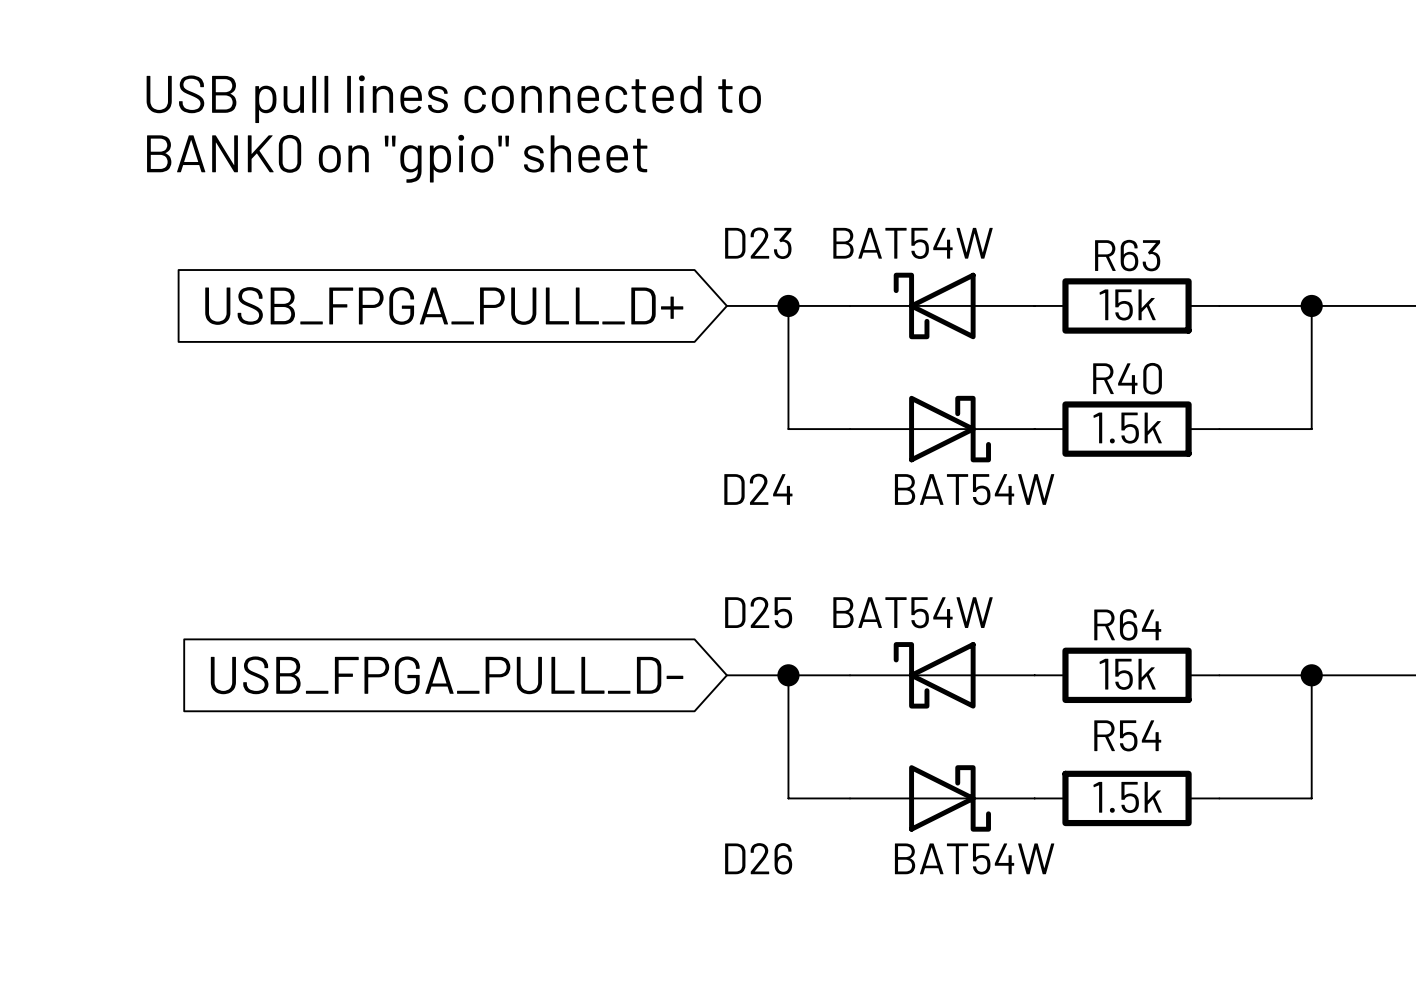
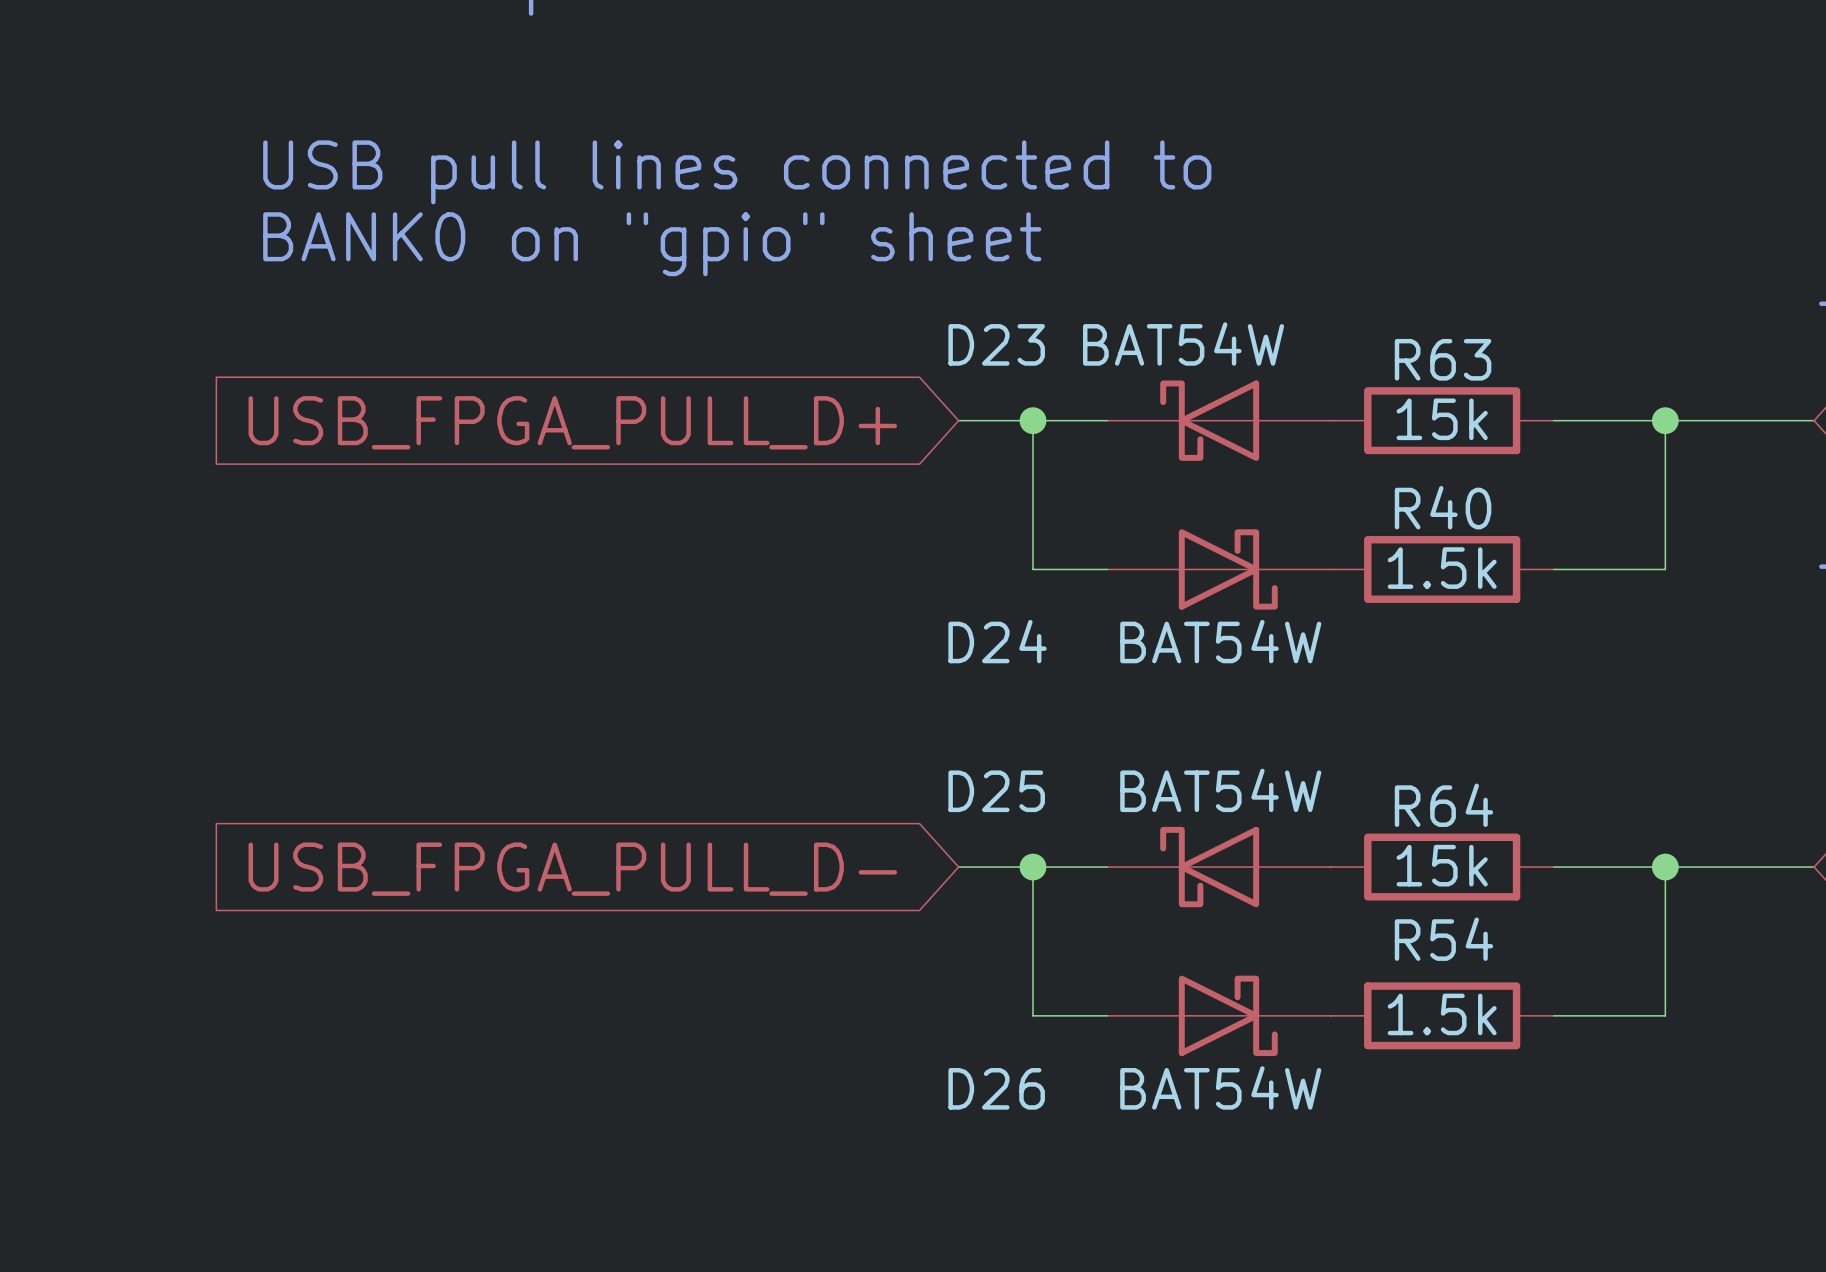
D24 value position: BAT54W (974, 489) -> BAT54W (1220, 641)
D25 value position: BAT54W (913, 612) -> BAT54W (1220, 1087)
D26 value position: BAT54W (974, 859) -> BAT54W (1220, 790)

